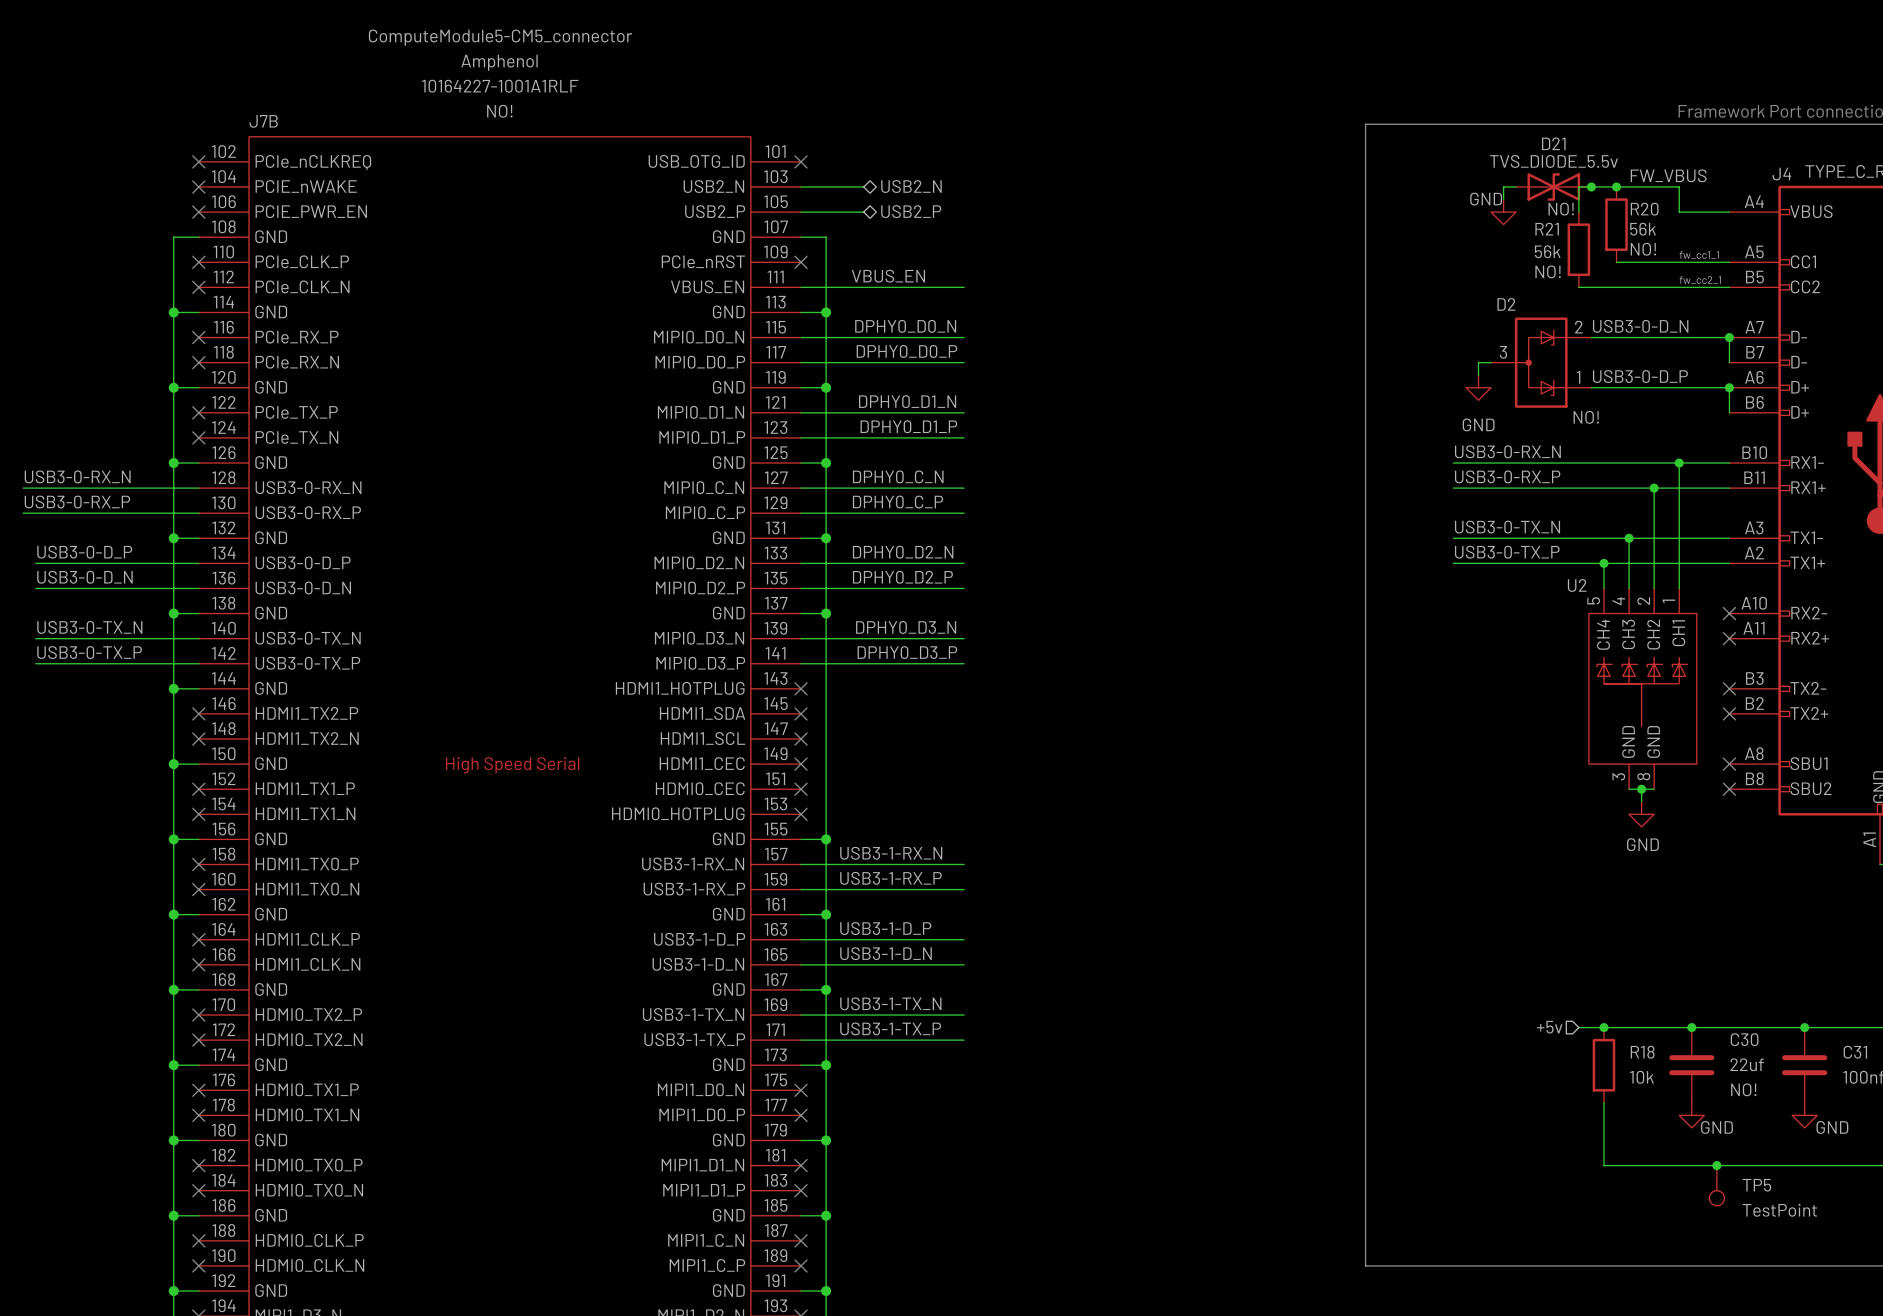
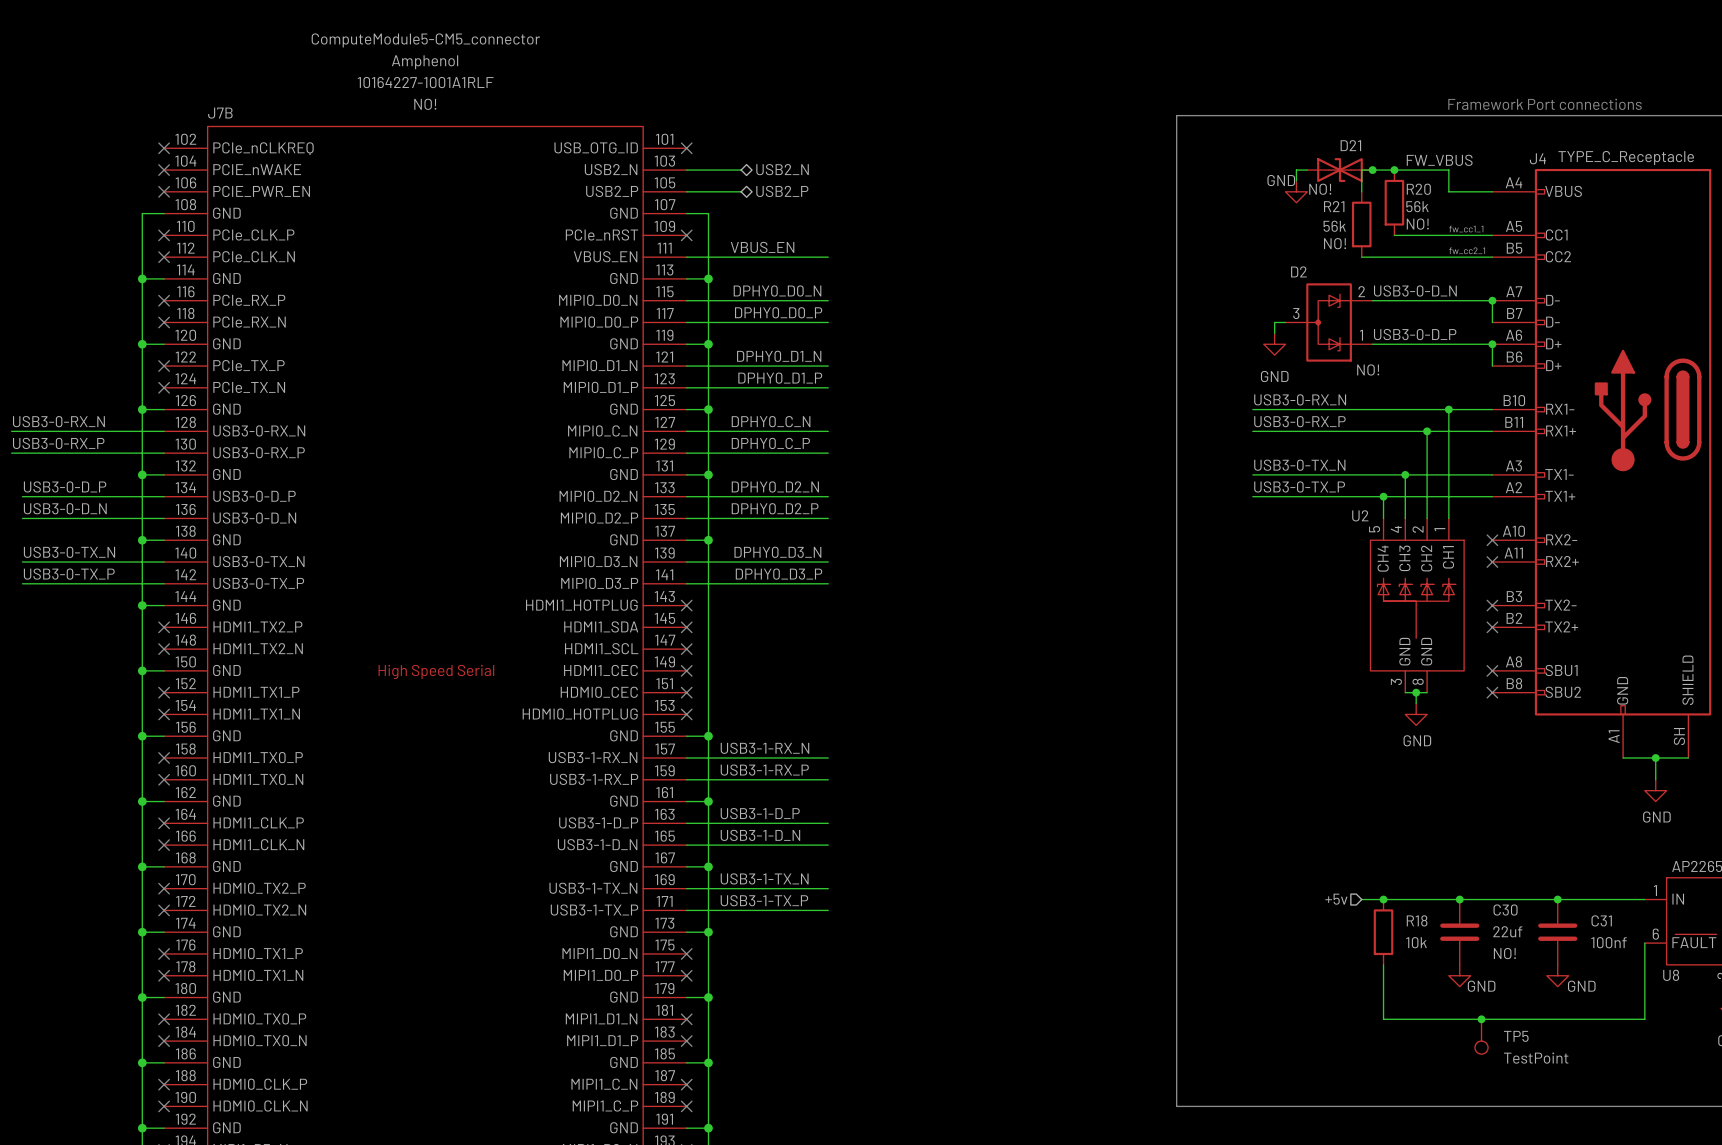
D21 value: TVS_DIODE_5.5v (1553, 161) -> none
D21 flip: as is (1553, 187) -> left-right (1339, 170)

